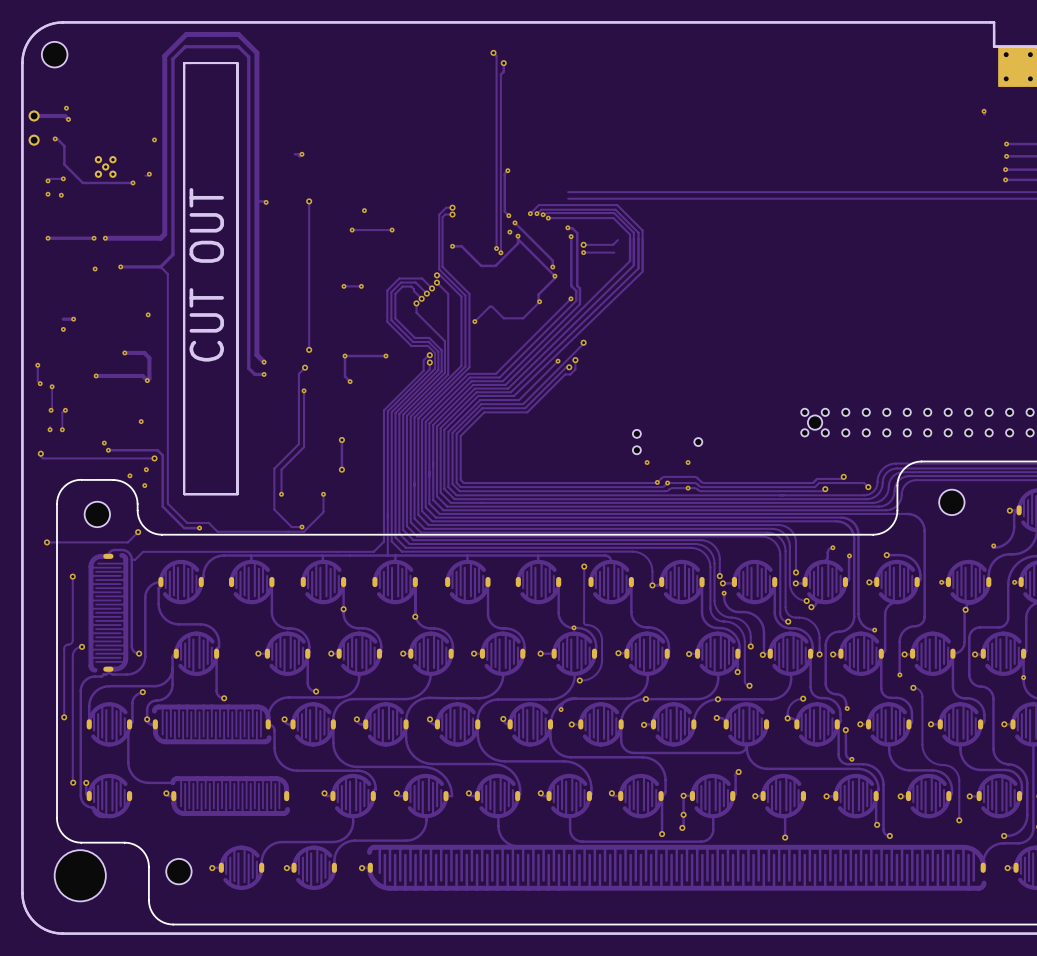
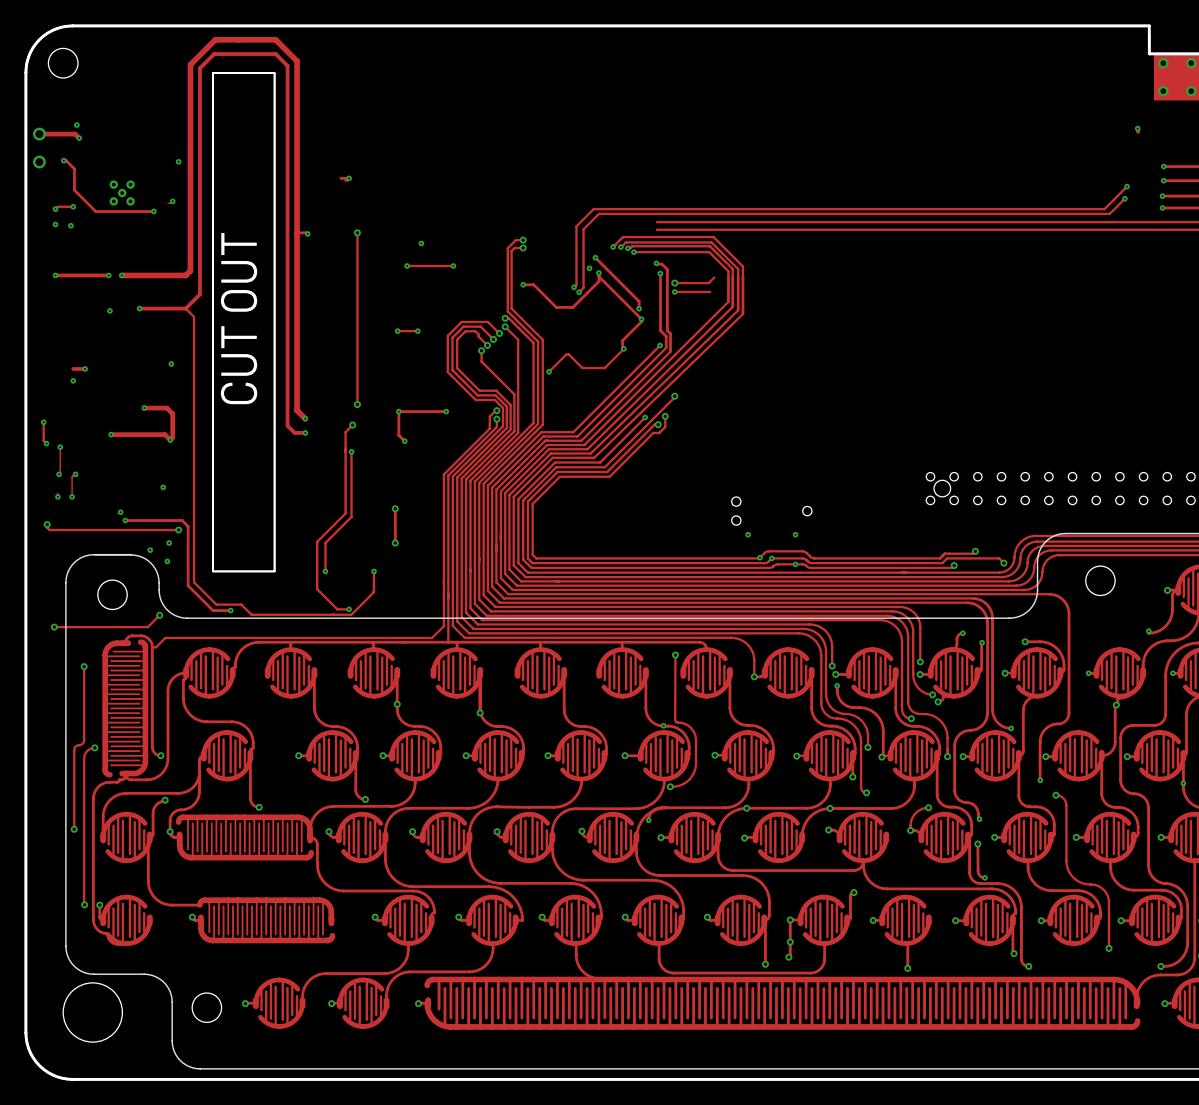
track: (493, 52) (496, 55) (496, 248) -> (1127, 186) (1104, 209) (593, 209) (576, 226) (576, 284) (574, 287)
via: (493, 52) -> none
track: (503, 63) (503, 71) (500, 74) (500, 252) -> (1124, 198) (1109, 213) (598, 213) (583, 229) (583, 287) (579, 292)
via: (503, 63) -> none
via: none -> (1127, 186)
track: (507, 170) (504, 173) (504, 211) (508, 215) -> none
via: (507, 170) -> none
via: none -> (1124, 198)
via: (508, 215) -> none

